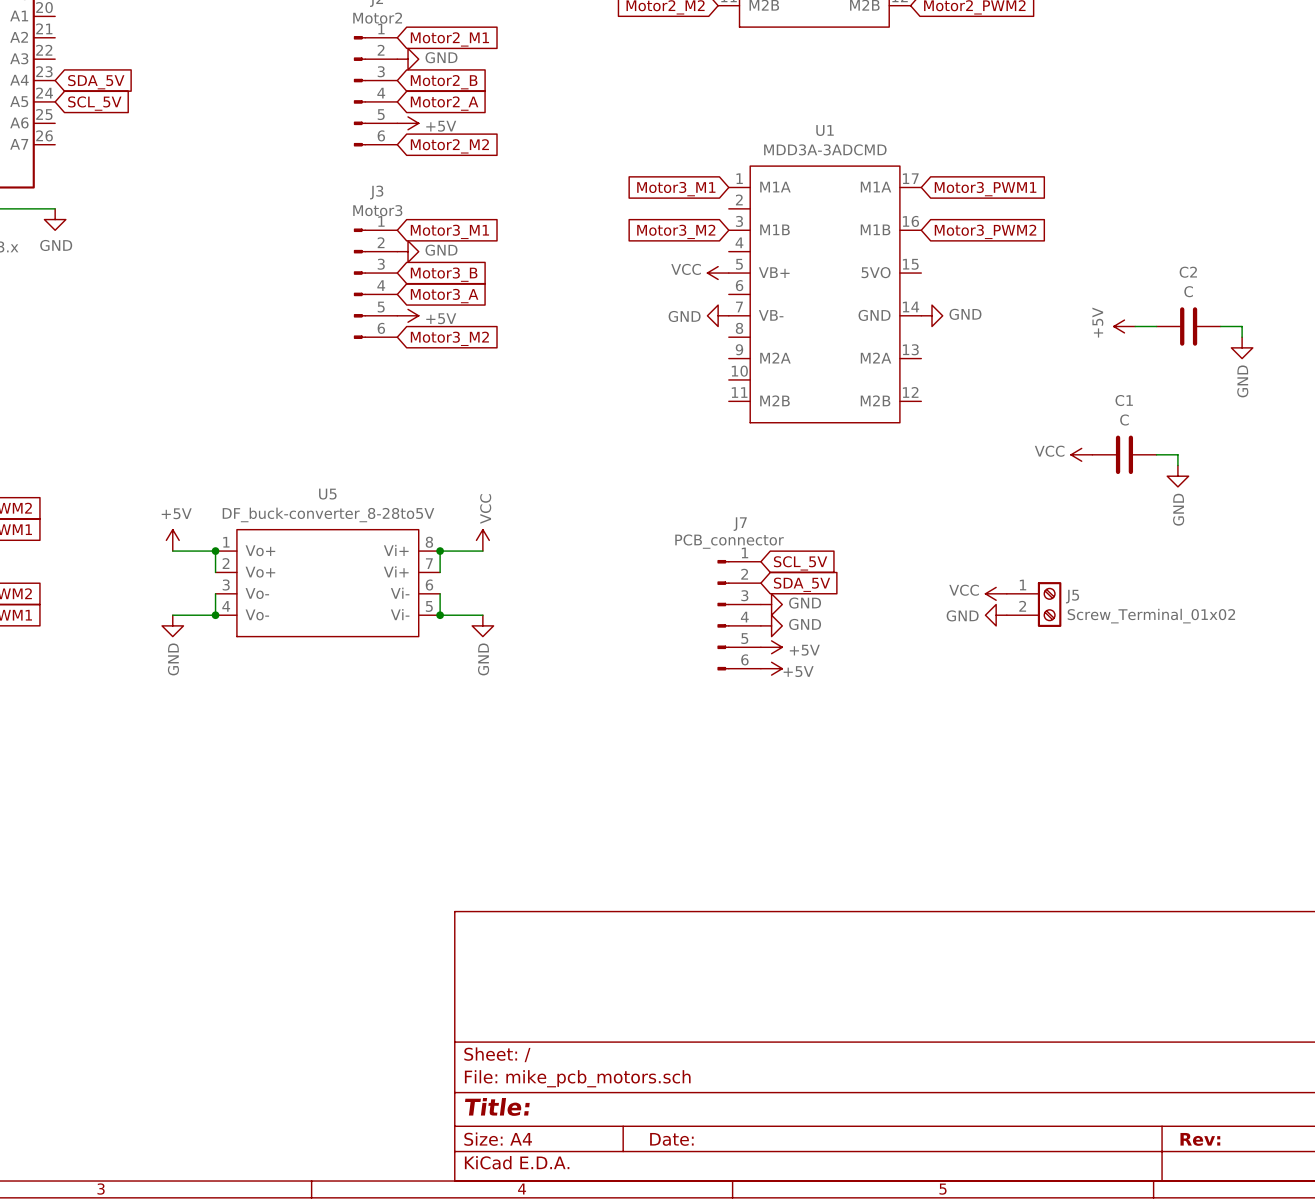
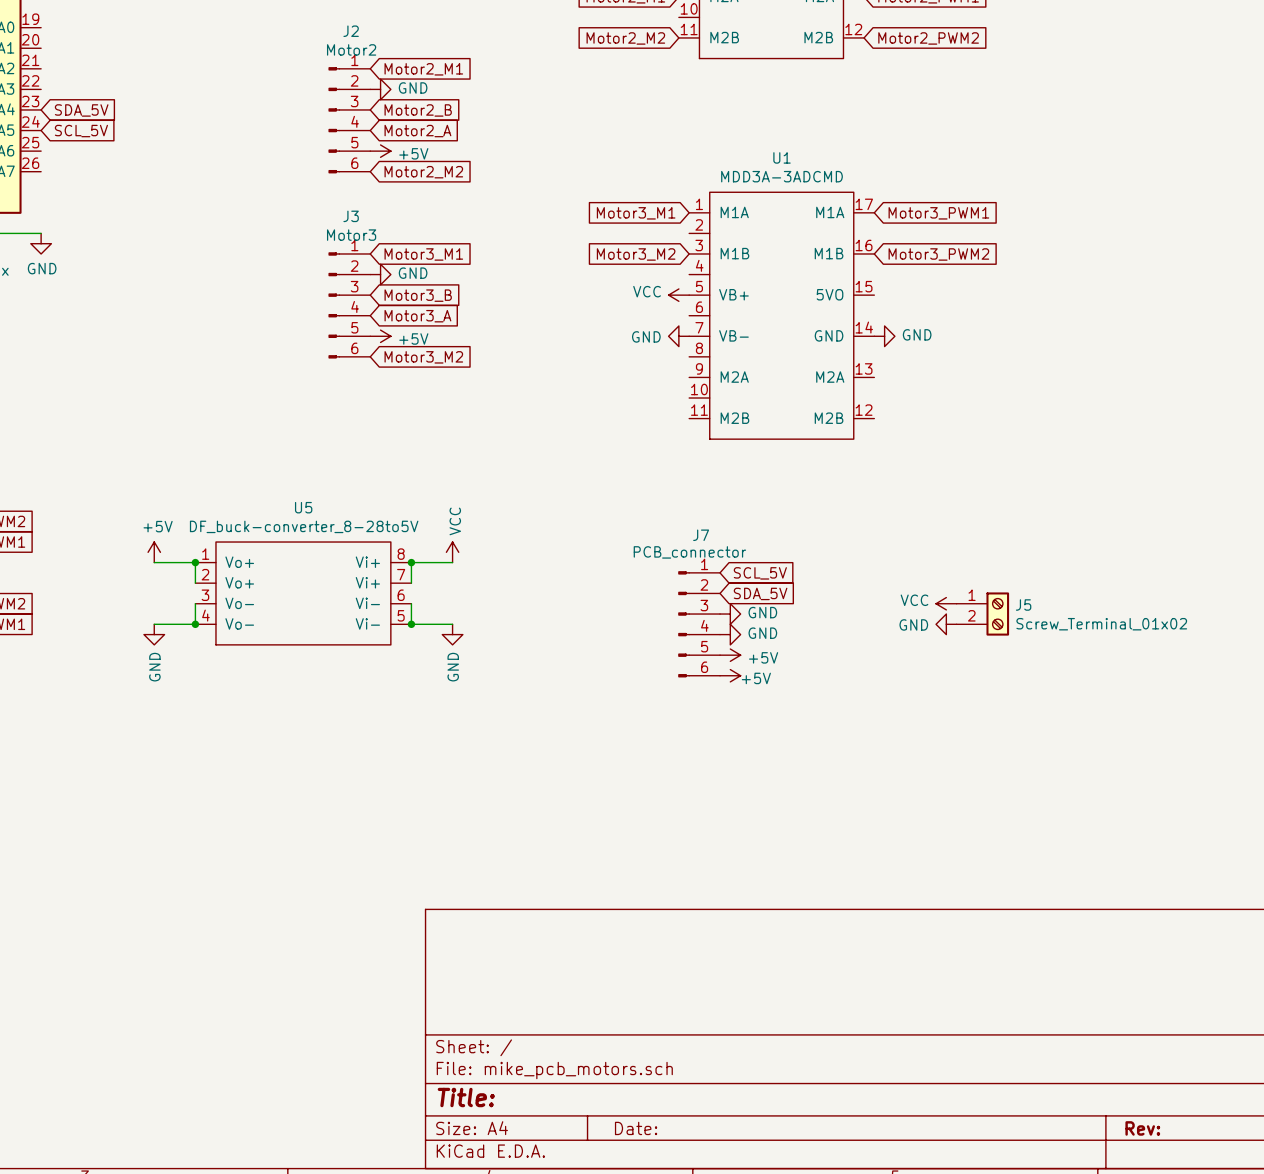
power symbol: +5V (1124, 326) -> none
wire: (1135, 326) (1156, 326) -> none
C2: C (1188, 326) -> none
wire: (1220, 326) (1242, 326) (1242, 337) -> none
power symbol: GND (1242, 347) -> none
power symbol: VCC (1081, 454) -> none
C1: C (1124, 454) -> none
wire: (1156, 454) (1177, 454) (1177, 465) -> none
power symbol: GND (1177, 476) -> none

